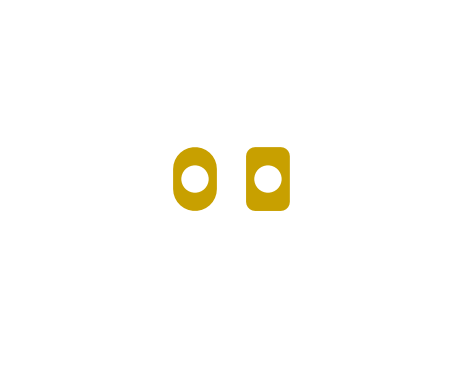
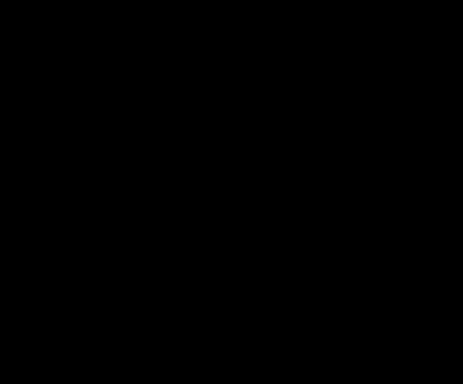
part: (231, 179) -> none

